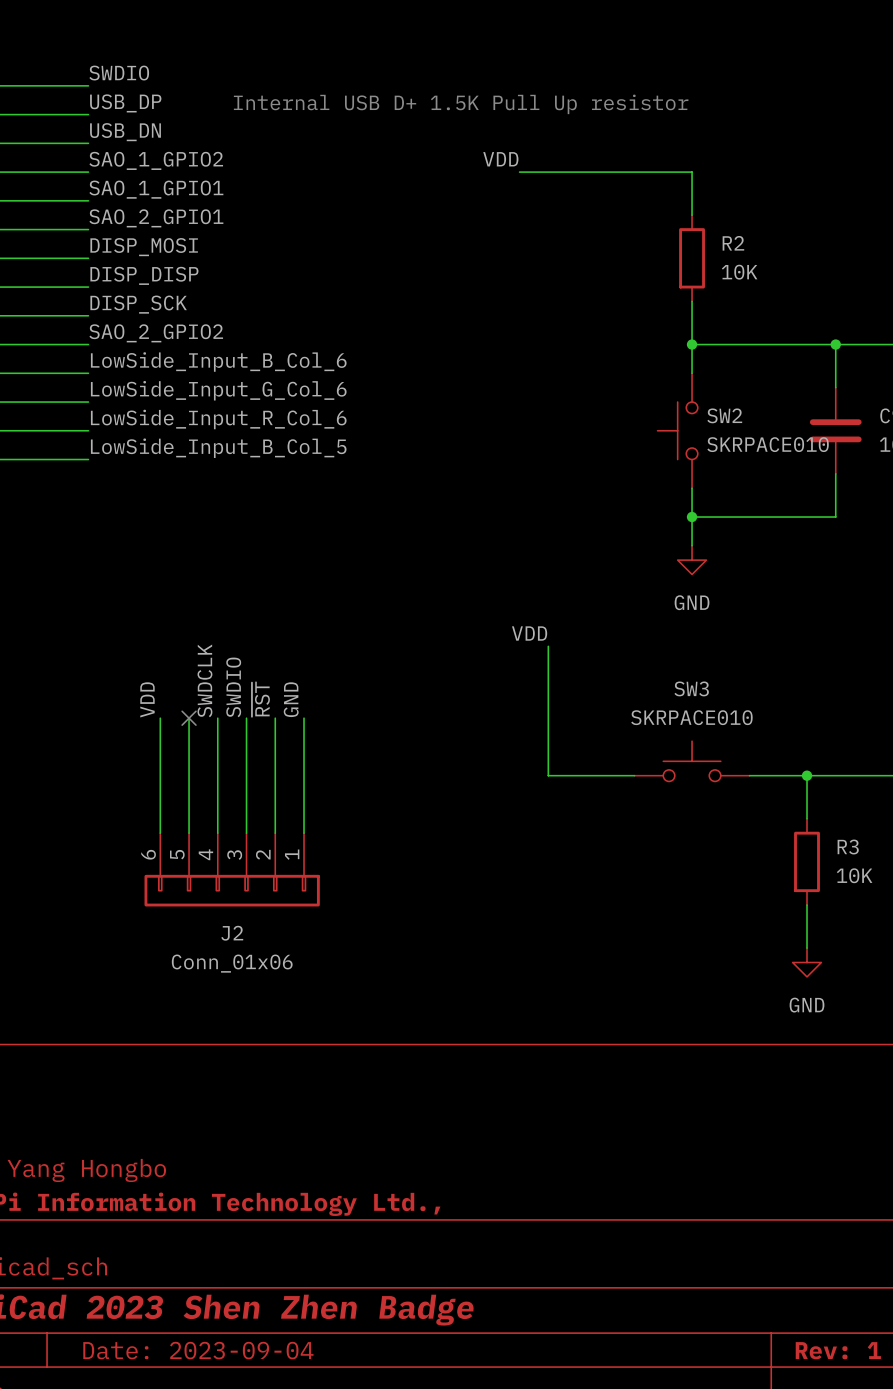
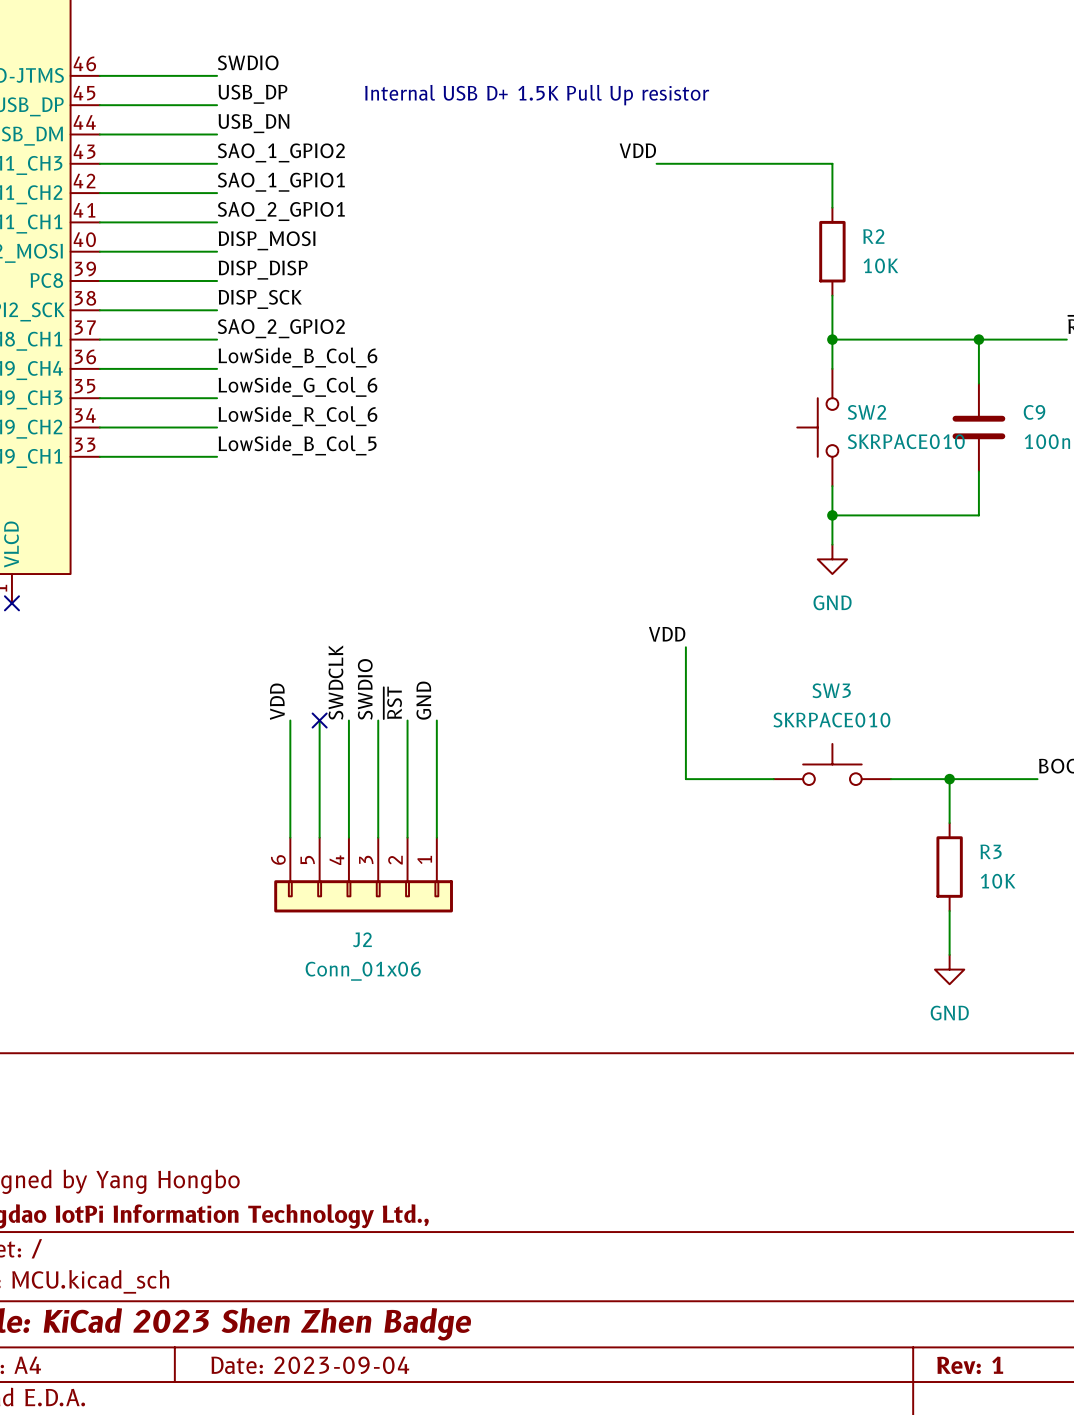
label: LowSide_Input_B_Col_6 (218, 362) -> LowSide_B_Col_6 (297, 357)
label: LowSide_Input_G_Col_6 (218, 390) -> LowSide_G_Col_6 (297, 386)
label: LowSide_Input_R_Col_6 (218, 419) -> LowSide_R_Col_6 (297, 416)
label: LowSide_Input_B_Col_5 (218, 448) -> LowSide_B_Col_5 (297, 445)

